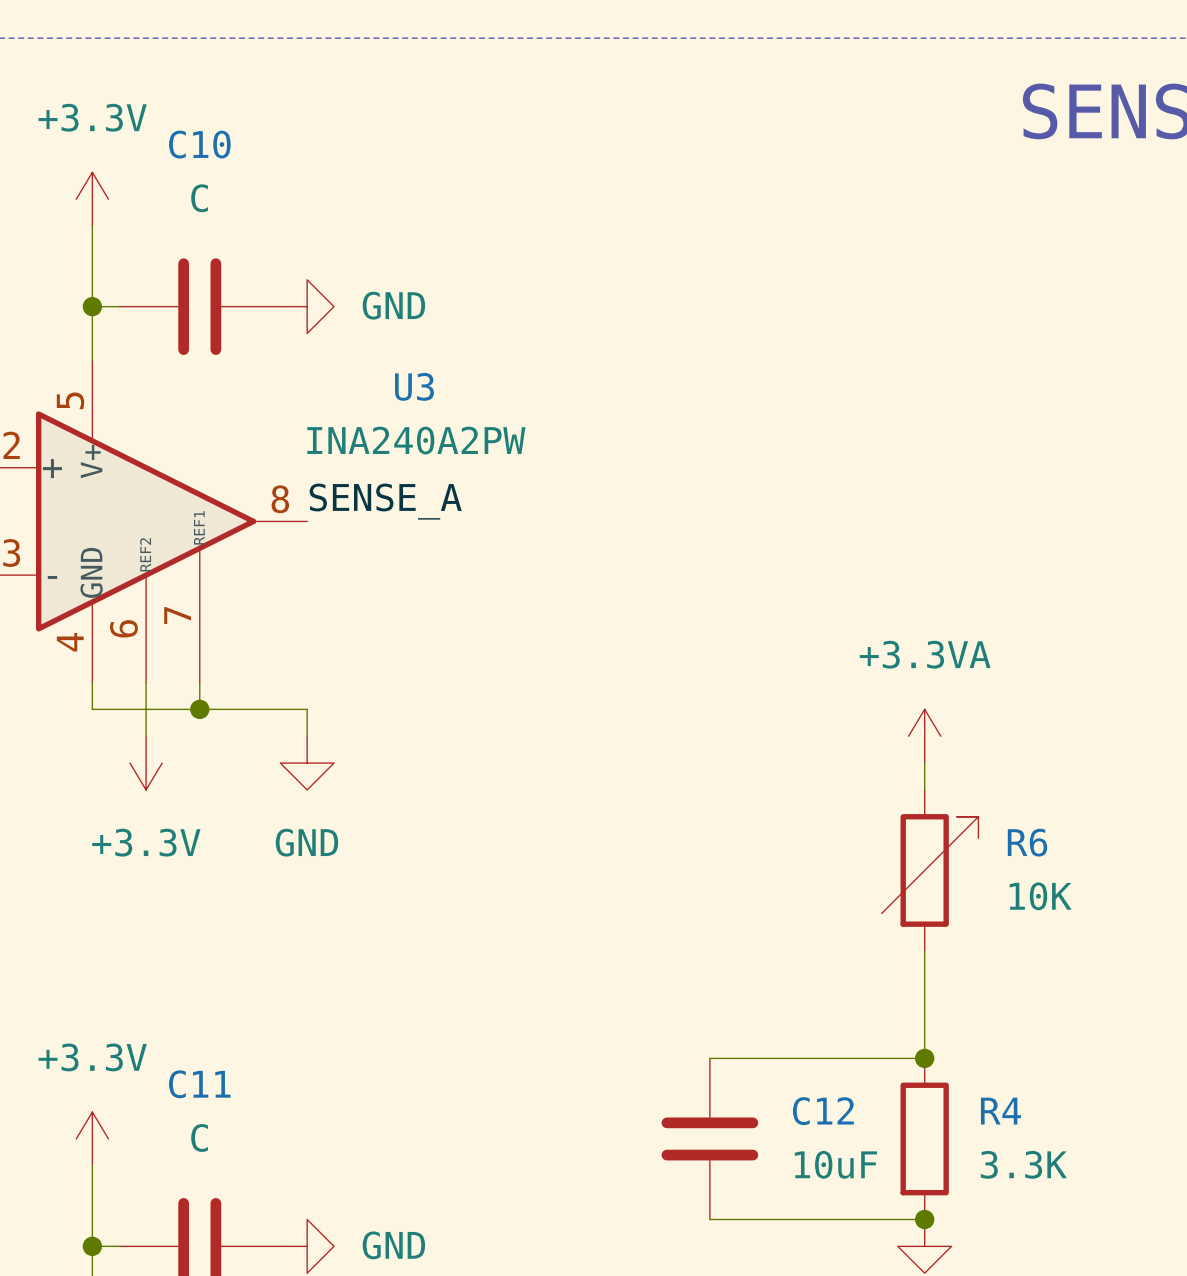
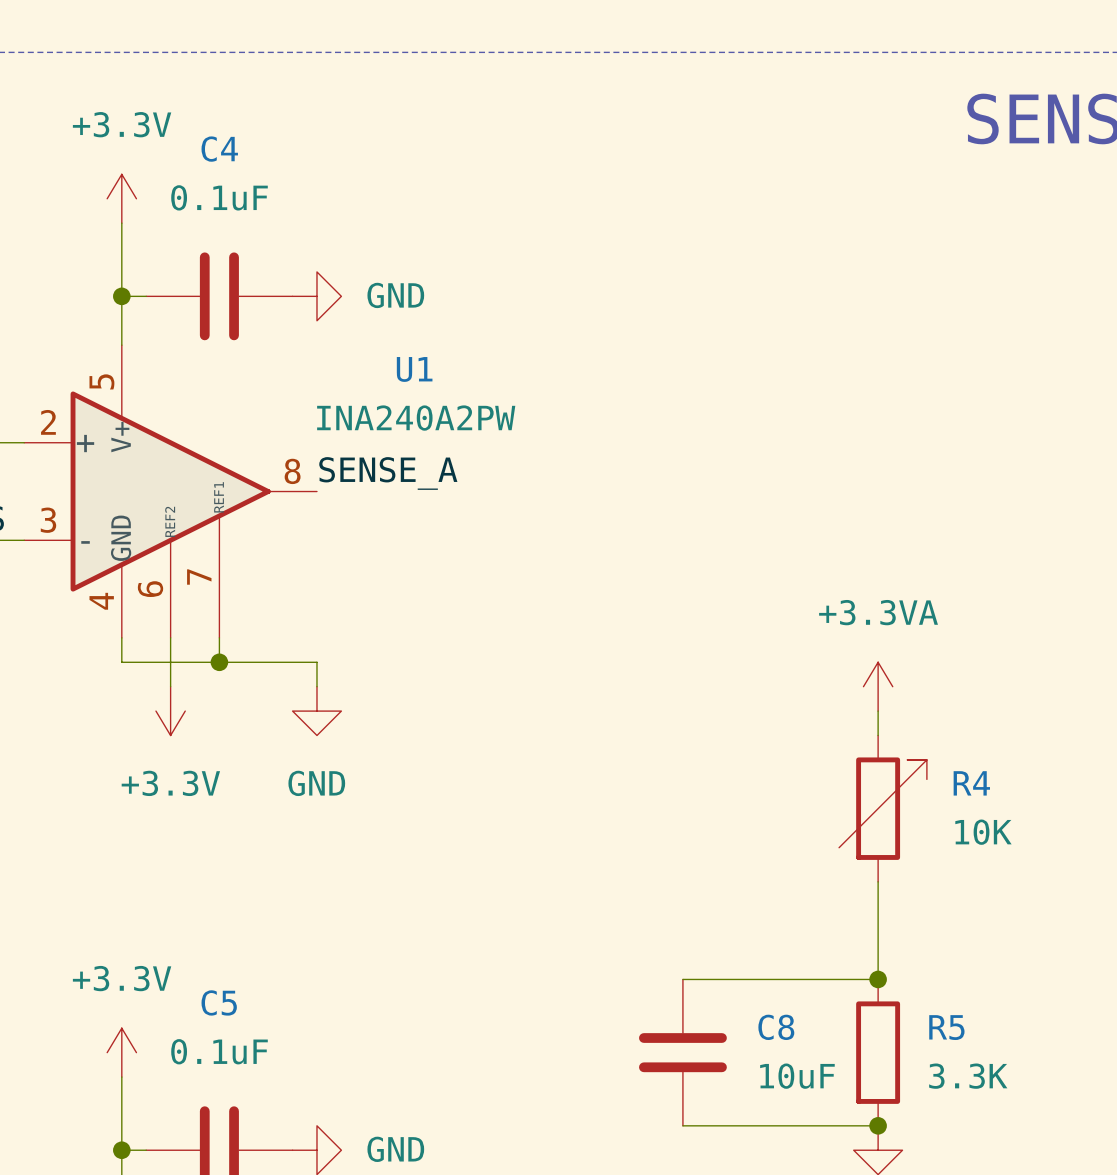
C10 name: C10 (199, 144) -> C4 (219, 149)
C10 value: C (199, 198) -> 0.1uF (219, 197)
U3 name: U3 (414, 386) -> U1 (414, 369)
R6 name: R6 (1027, 842) -> R4 (971, 783)
C11 name: C11 (199, 1084) -> C5 (219, 1002)
C12 name: C12 (823, 1111) -> C8 (776, 1027)
R4 name: R4 (1000, 1111) -> R5 (946, 1027)
C11 value: C (199, 1137) -> 0.1uF (219, 1051)

